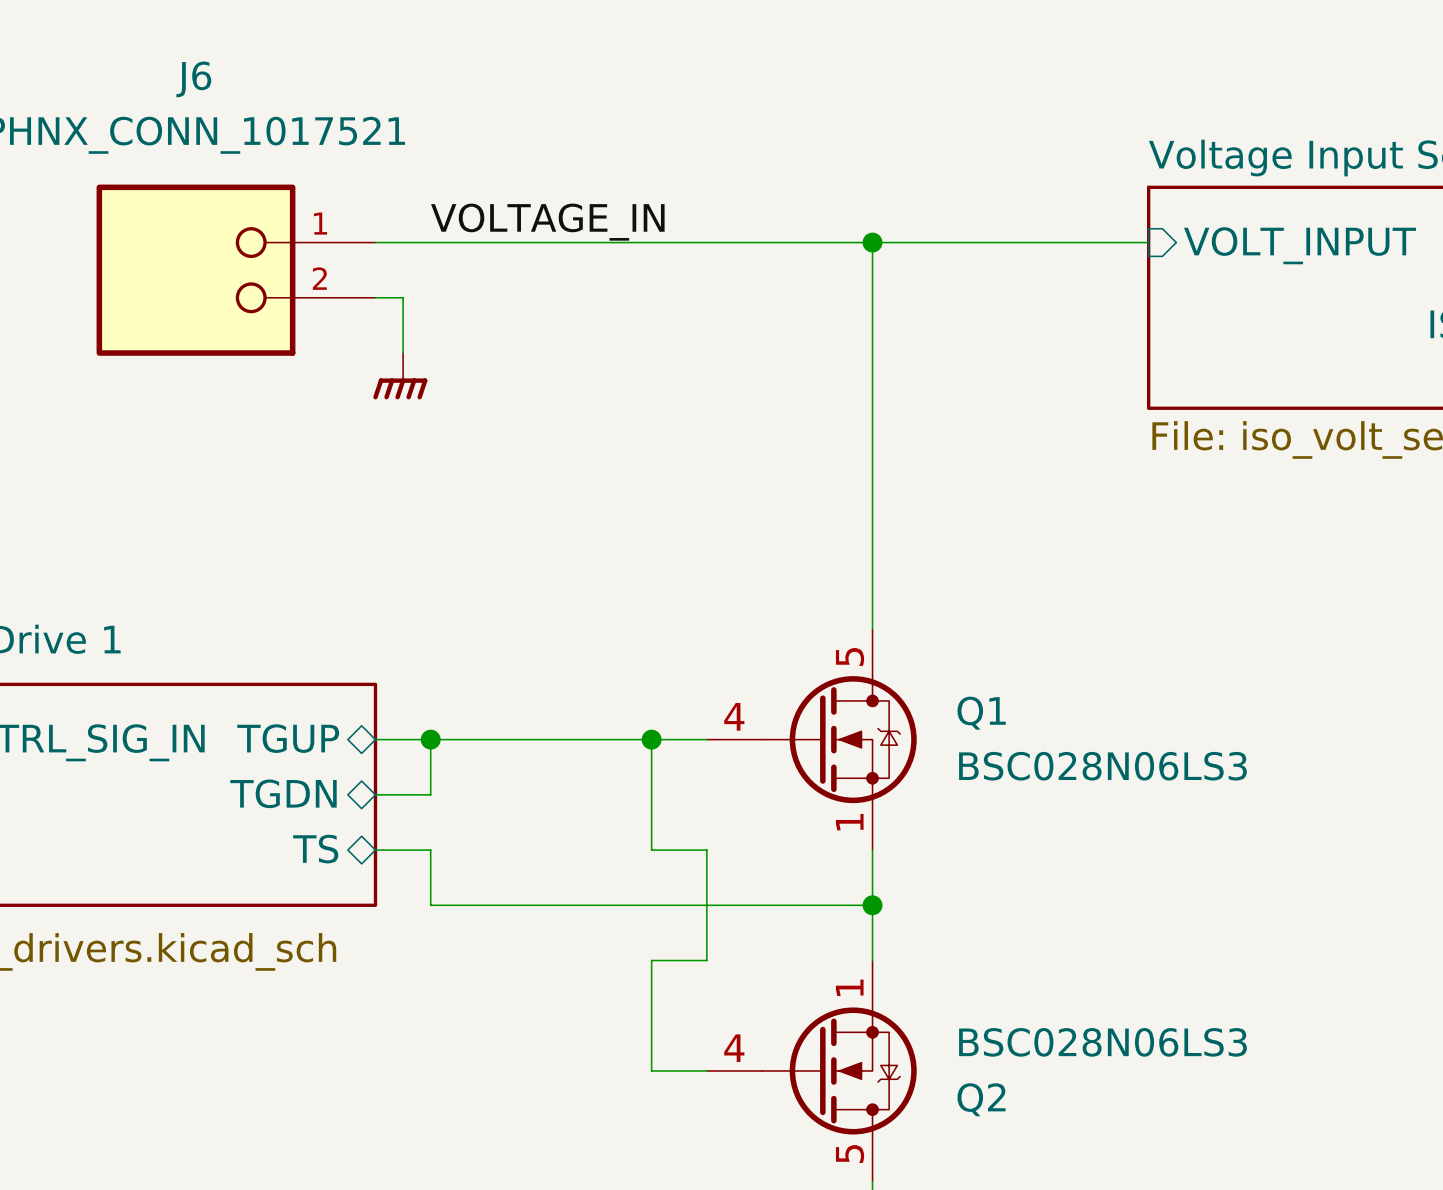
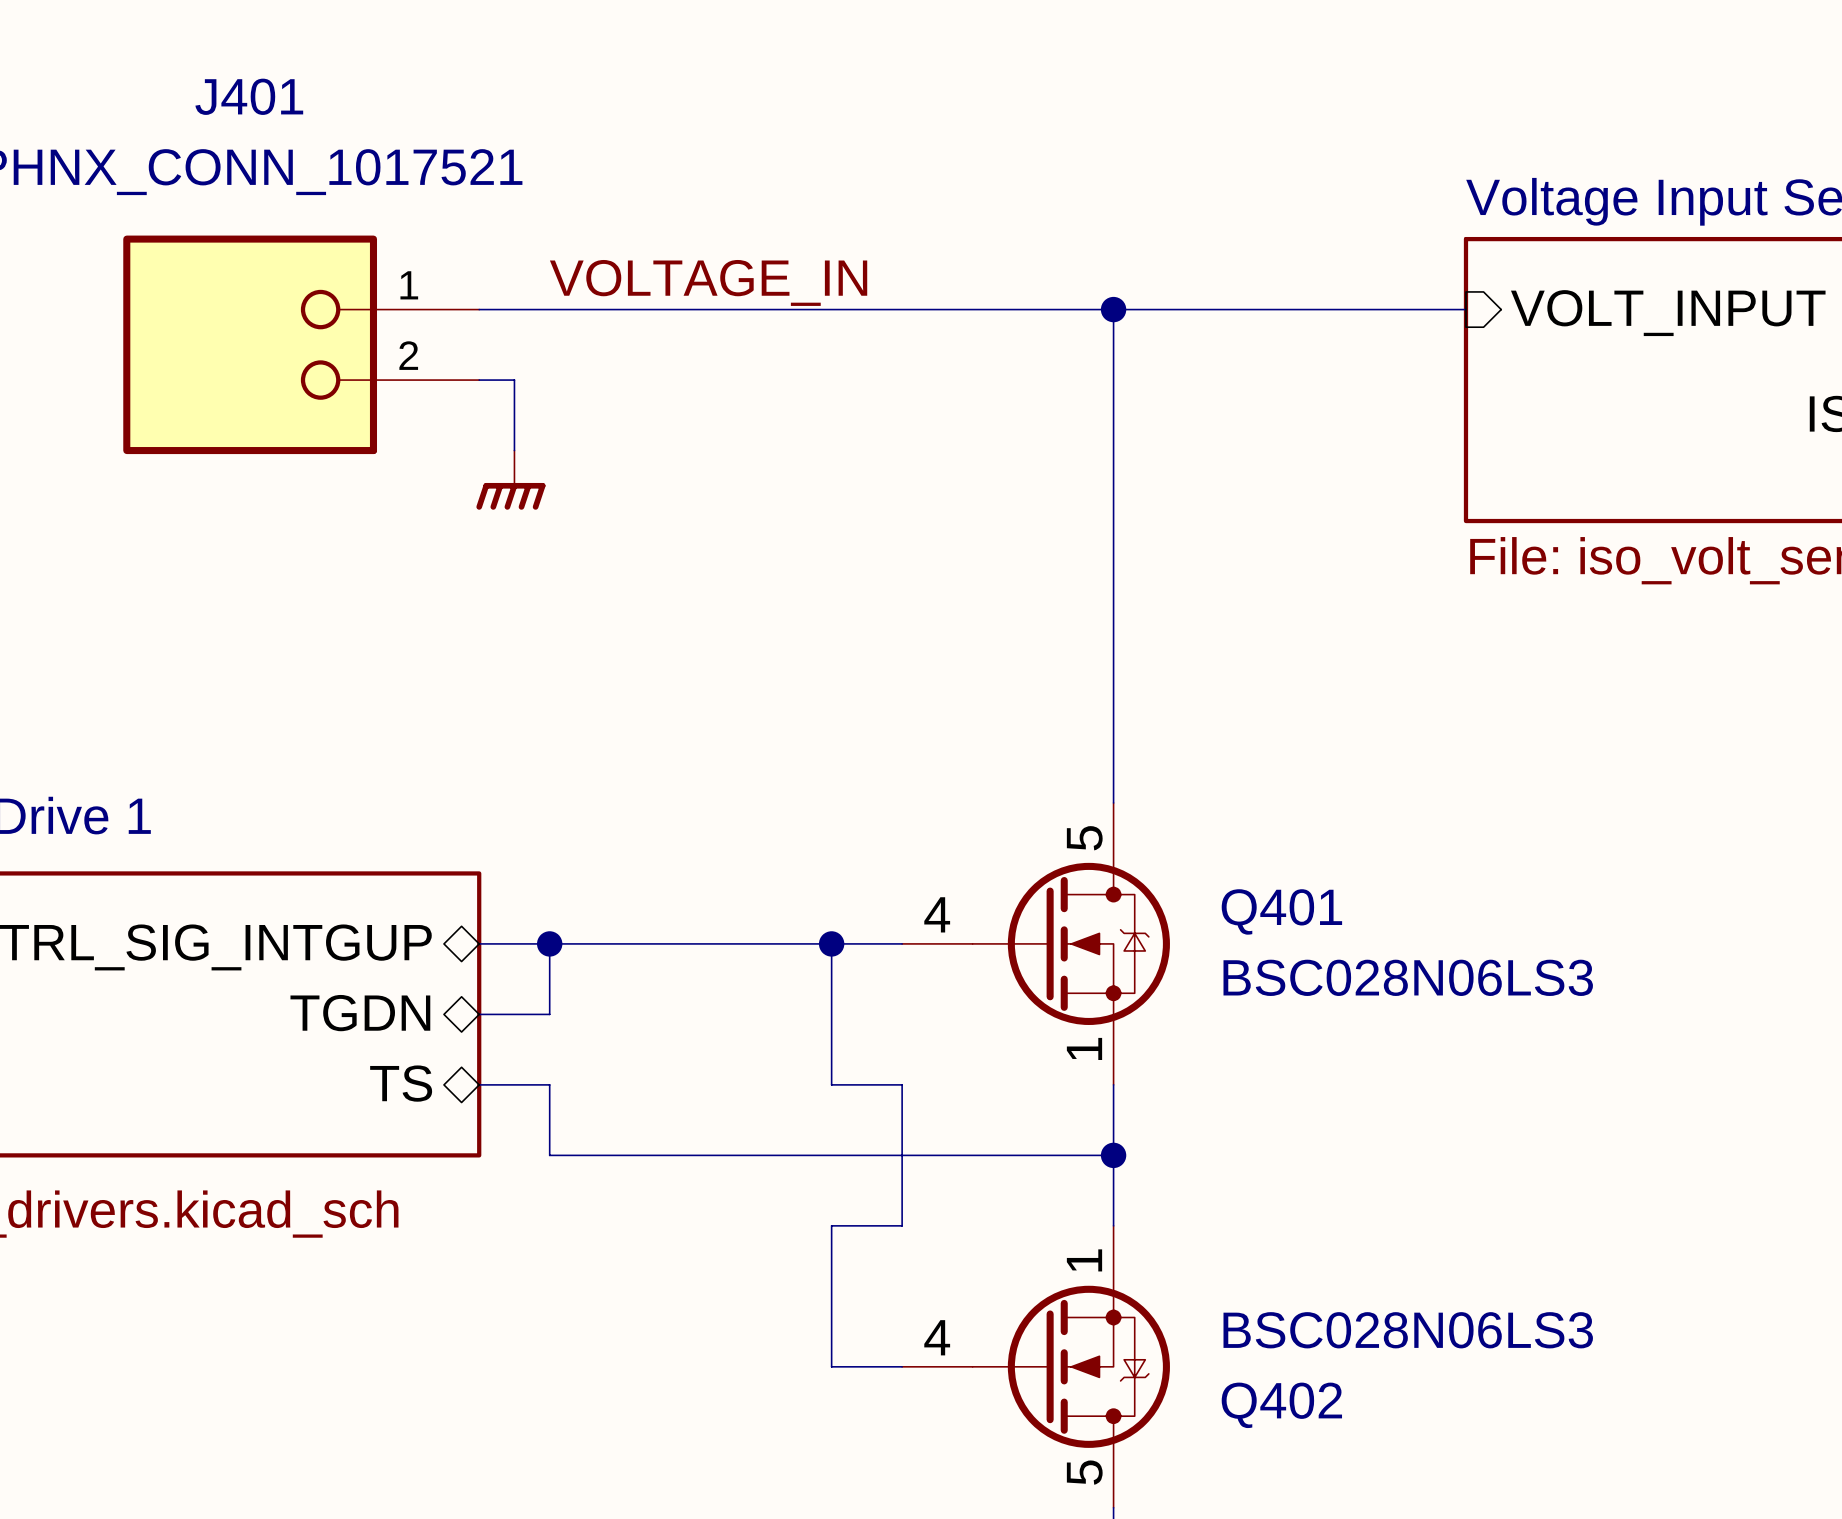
J6 name: J6 (193, 79) -> J401 (249, 96)
Q1 name: Q1 (981, 713) -> Q401 (1281, 911)
Q2 name: Q2 (981, 1099) -> Q402 (1281, 1405)

